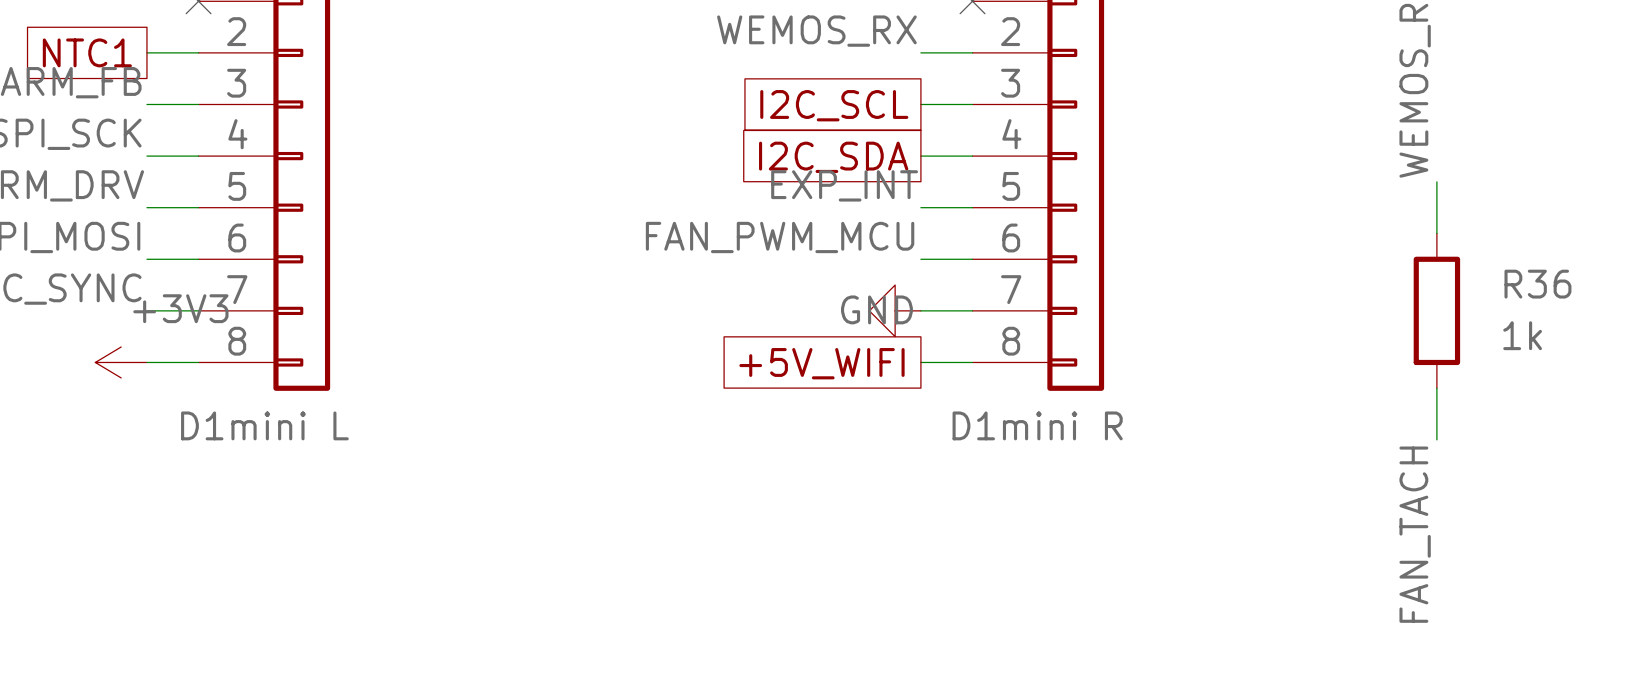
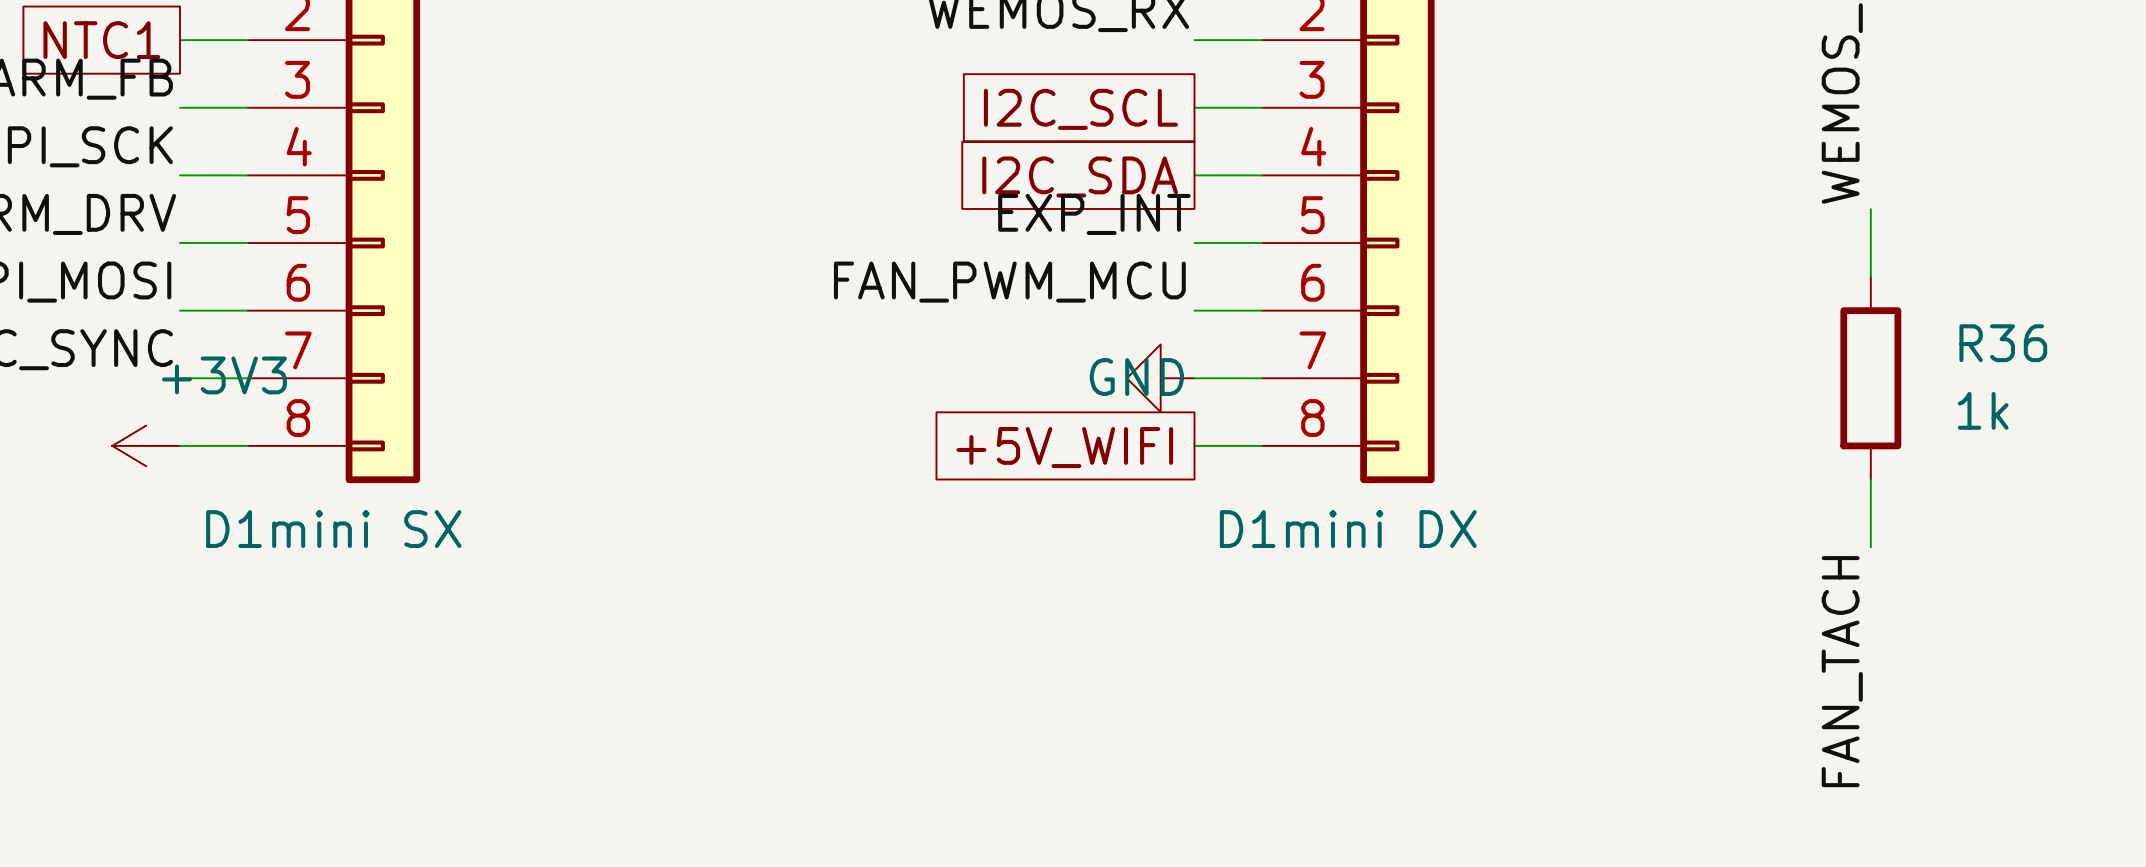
part value: D1mini L (264, 425) -> D1mini SX (333, 529)
part value: D1mini R (1037, 425) -> D1mini DX (1348, 529)

